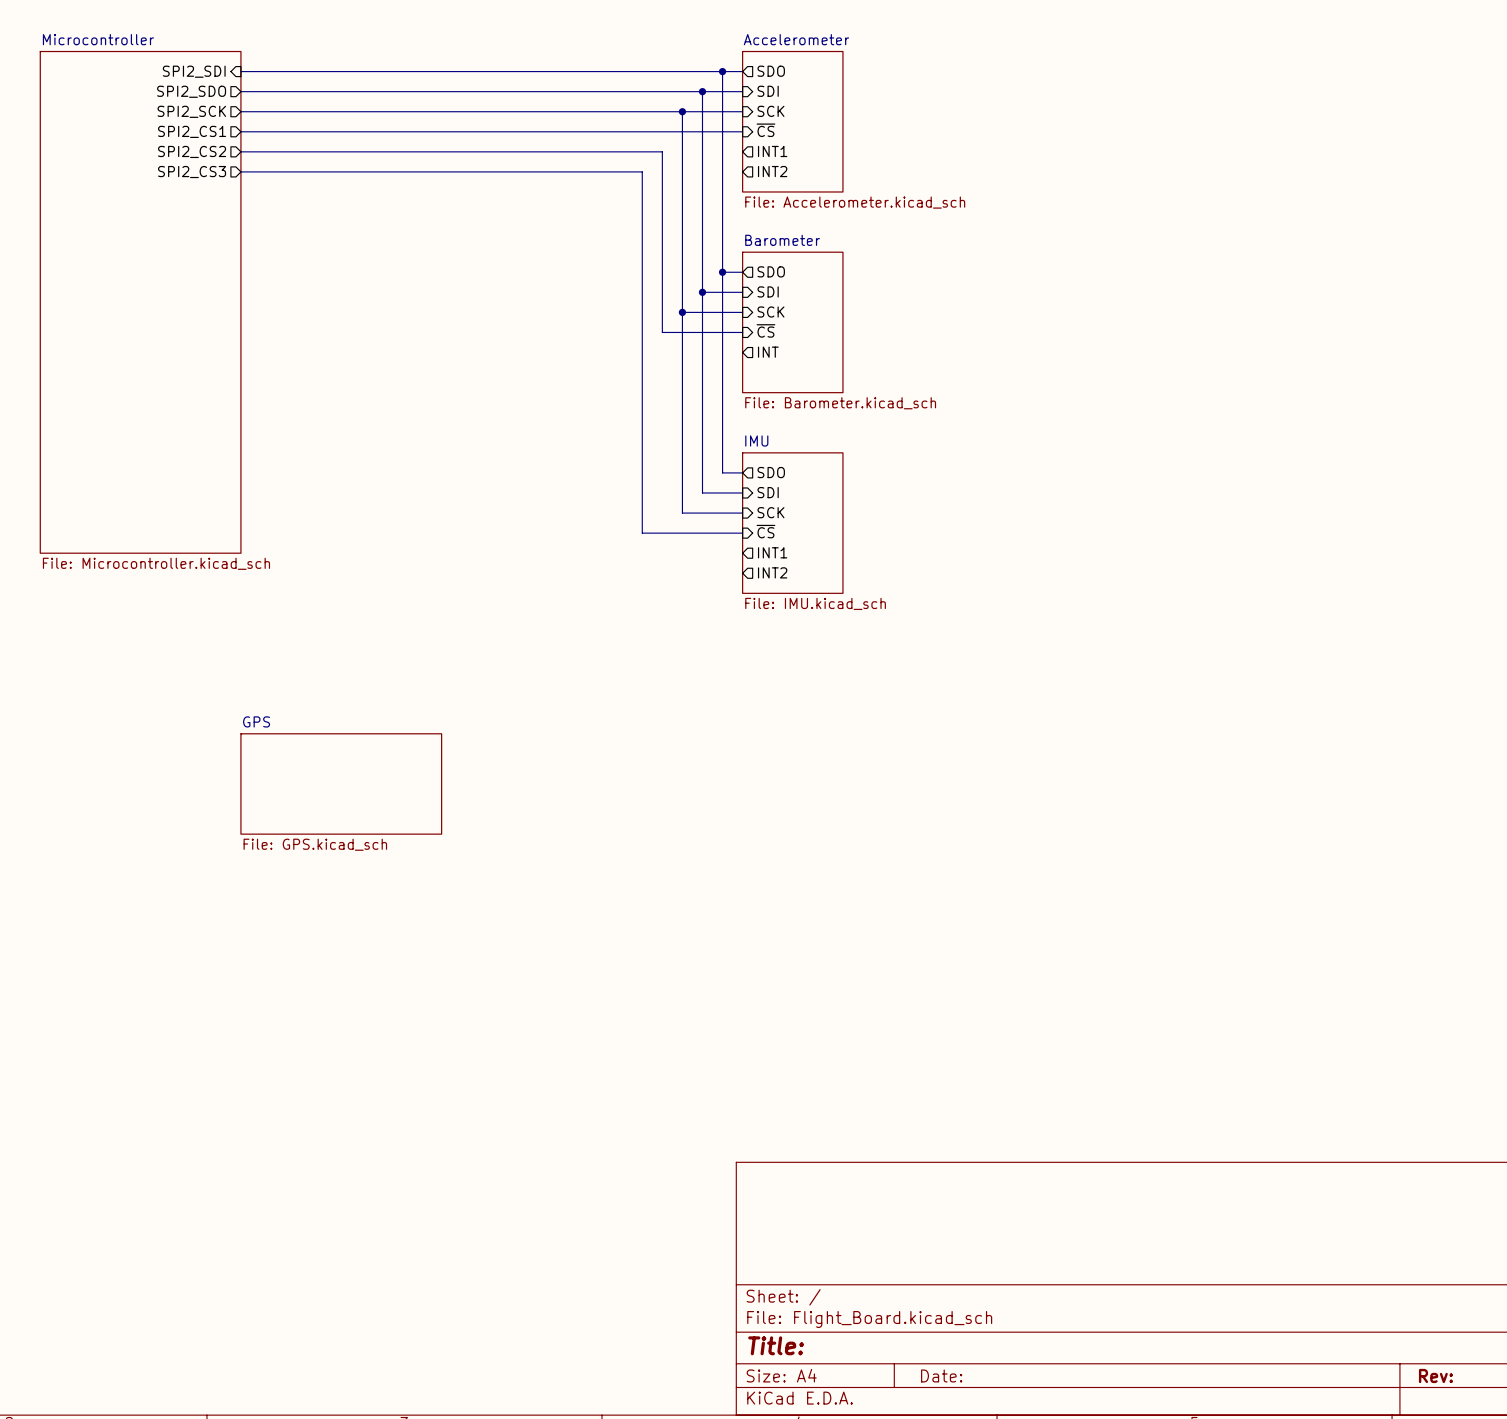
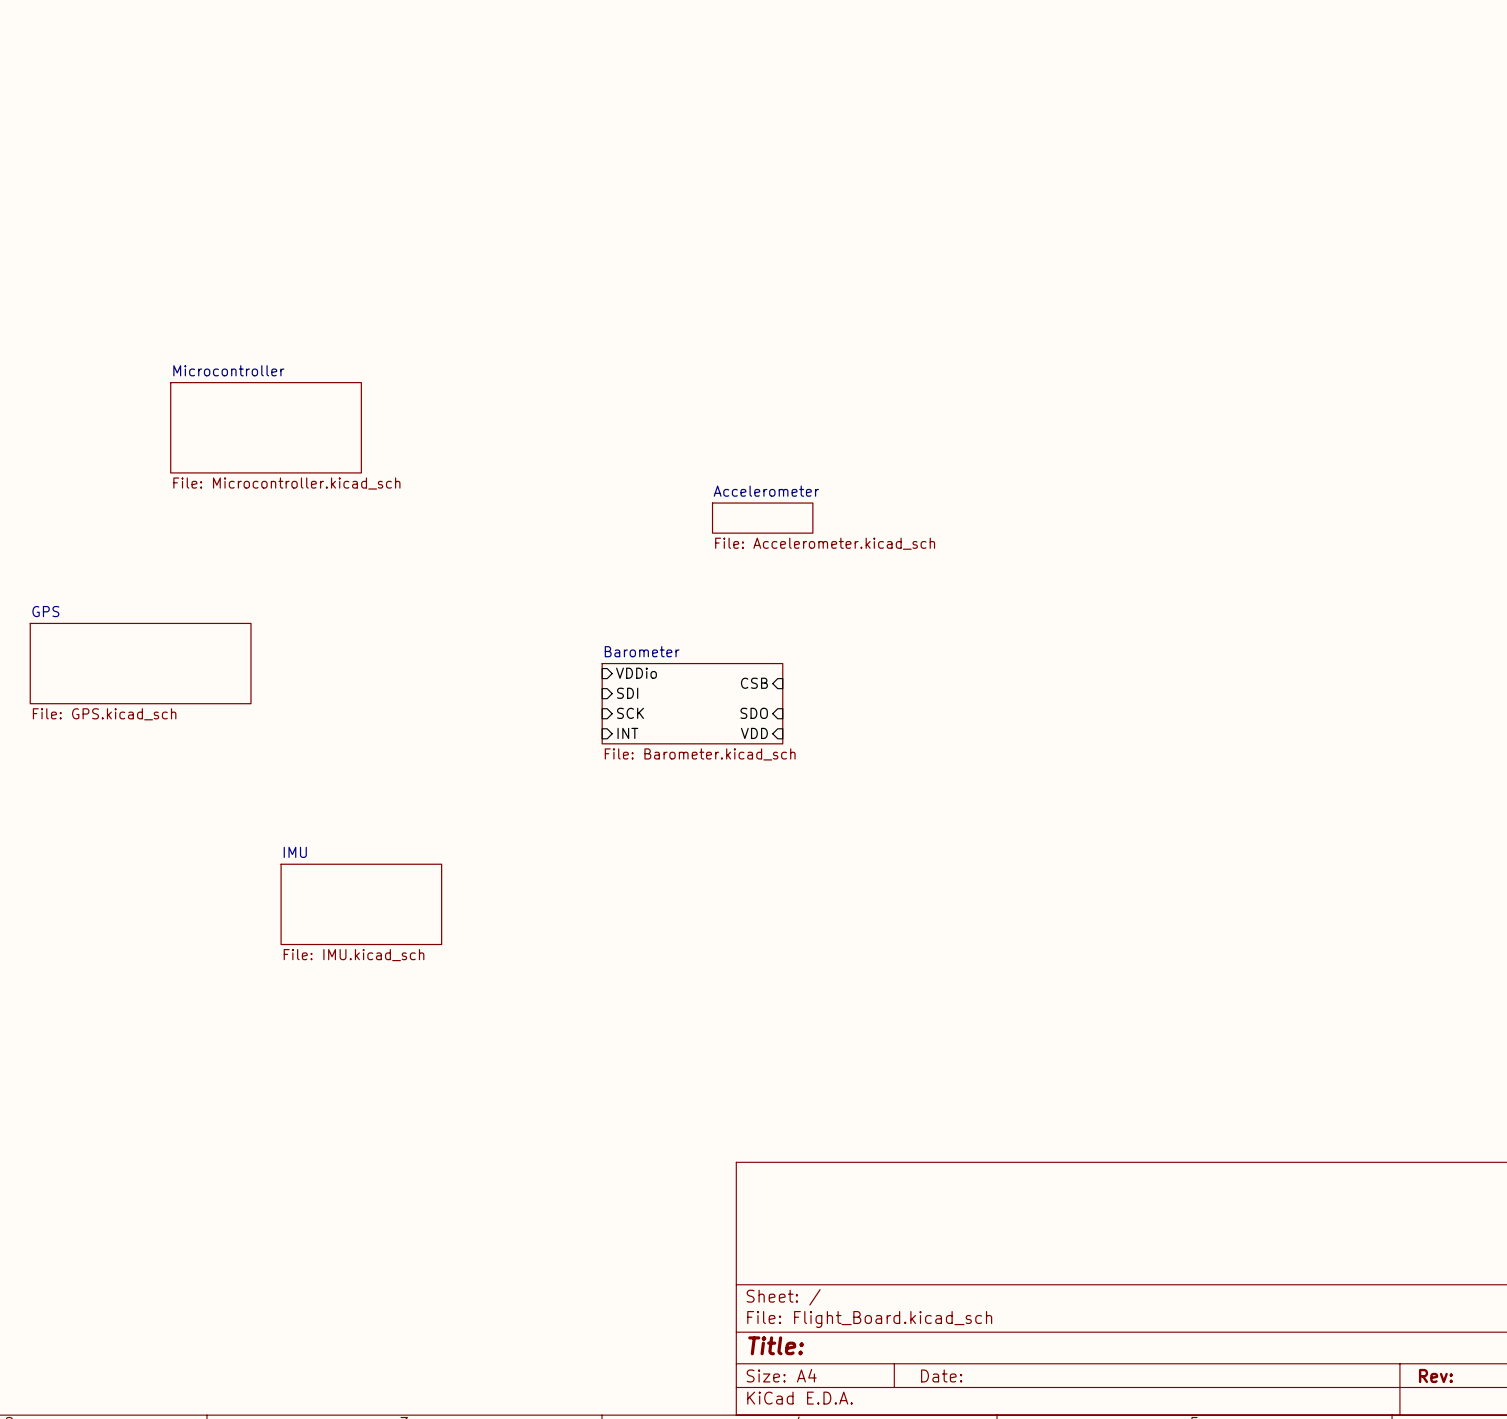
sheet pin: SPI2_SDI (194, 71) -> none
wire: (240, 71) (742, 71) -> none
wire: (722, 71) (722, 472) (742, 472) -> none
junction: (722, 71) -> none
sheet pin: SDO (771, 71) -> none
sheet pin: SPI2_SDO (191, 91) -> none
wire: (240, 91) (742, 91) -> none
wire: (702, 91) (702, 492) (742, 492) -> none
junction: (702, 91) -> none
sheet pin: SDI (768, 91) -> none
sheet pin: SPI2_SCK (191, 111) -> none
wire: (240, 111) (742, 111) -> none
wire: (682, 111) (682, 513) (742, 513) -> none
junction: (682, 111) -> none
sheet pin: SCK (770, 111) -> none
sheet Accelerometer: File: Accelerometer.kicad_sch (792, 121) -> none
sheet pin: ~{CS} (765, 130) -> none
sheet pin: SPI2_CS1 (192, 131) -> none
wire: (240, 131) (742, 131) -> none
sheet pin: SPI2_CS2 (192, 151) -> none
wire: (240, 151) (662, 151) (662, 332) (742, 332) -> none
sheet pin: INT1 (772, 151) -> none
wire: (240, 171) (642, 171) (642, 533) (742, 533) -> none
sheet pin: INT2 (772, 171) -> none
sheet pin: SPI2_CS3 (192, 172) -> none
sheet pin: SDO (771, 271) -> none
wire: (722, 272) (742, 272) -> none
junction: (722, 272) -> none
sheet pin: SDI (768, 291) -> none
wire: (702, 292) (742, 292) -> none
junction: (702, 292) -> none
sheet Microcontroller: File: Microcontroller.kicad_sch (140, 302) -> none
wire: (682, 312) (742, 312) -> none
junction: (682, 312) -> none
sheet pin: SCK (770, 312) -> none
sheet Barometer: File: Barometer.kicad_sch (792, 322) -> none
sheet pin: ~{CS} (765, 330) -> none
sheet pin: INT (768, 352) -> none
sheet Microcontroller: none -> File: Microcontroller.kicad_sch (266, 427)
sheet pin: SDO (771, 472) -> none
sheet pin: SDI (768, 492) -> none
sheet pin: SCK (770, 512) -> none
sheet Accelerometer: none -> File: Accelerometer.kicad_sch (762, 518)
sheet IMU: File: IMU.kicad_sch (792, 523) -> none
sheet pin: ~{CS} (765, 531) -> none
sheet pin: INT1 (772, 552) -> none
sheet pin: INT2 (772, 572) -> none
sheet GPS: none -> File: GPS.kicad_sch (140, 663)
sheet pin: none -> VDDio (636, 673)
sheet pin: none -> CSB (754, 683)
sheet pin: none -> SDI (627, 693)
sheet Barometer: none -> File: Barometer.kicad_sch (692, 703)
sheet pin: none -> SCK (630, 713)
sheet pin: none -> SDO (754, 713)
sheet pin: none -> INT (627, 733)
sheet pin: none -> VDD (754, 733)
sheet GPS: File: GPS.kicad_sch (341, 783) -> none
sheet IMU: none -> File: IMU.kicad_sch (361, 904)

